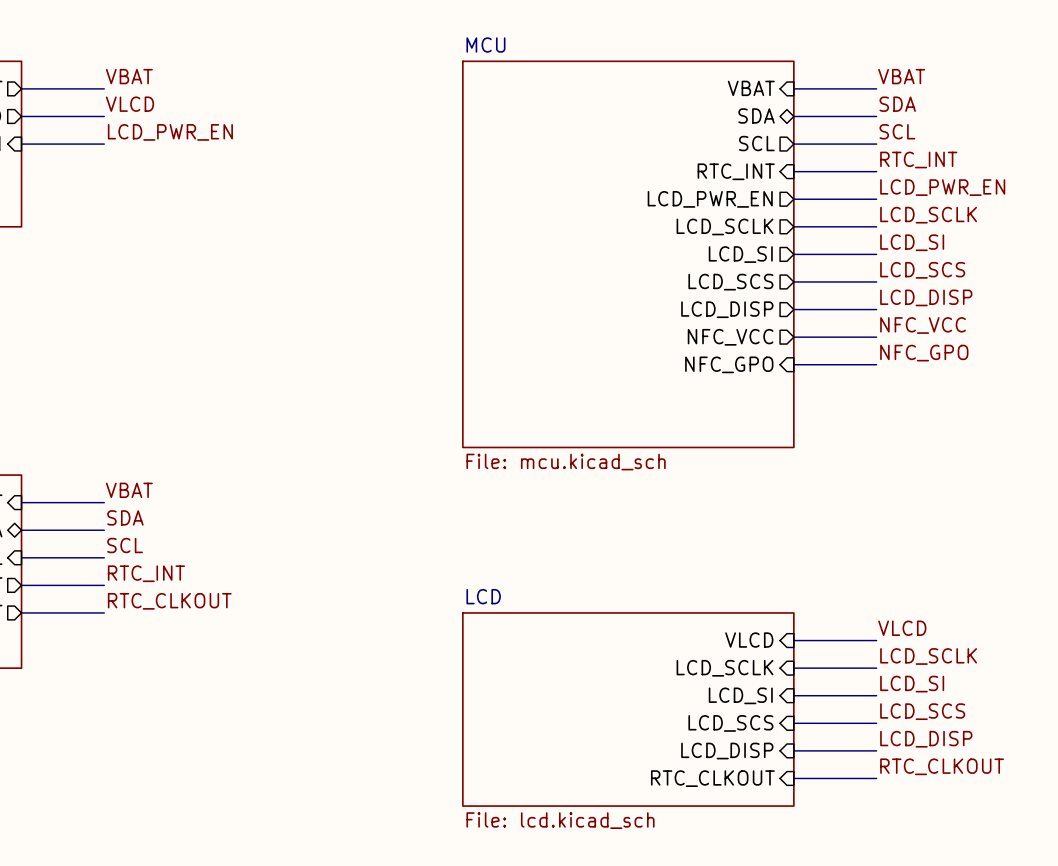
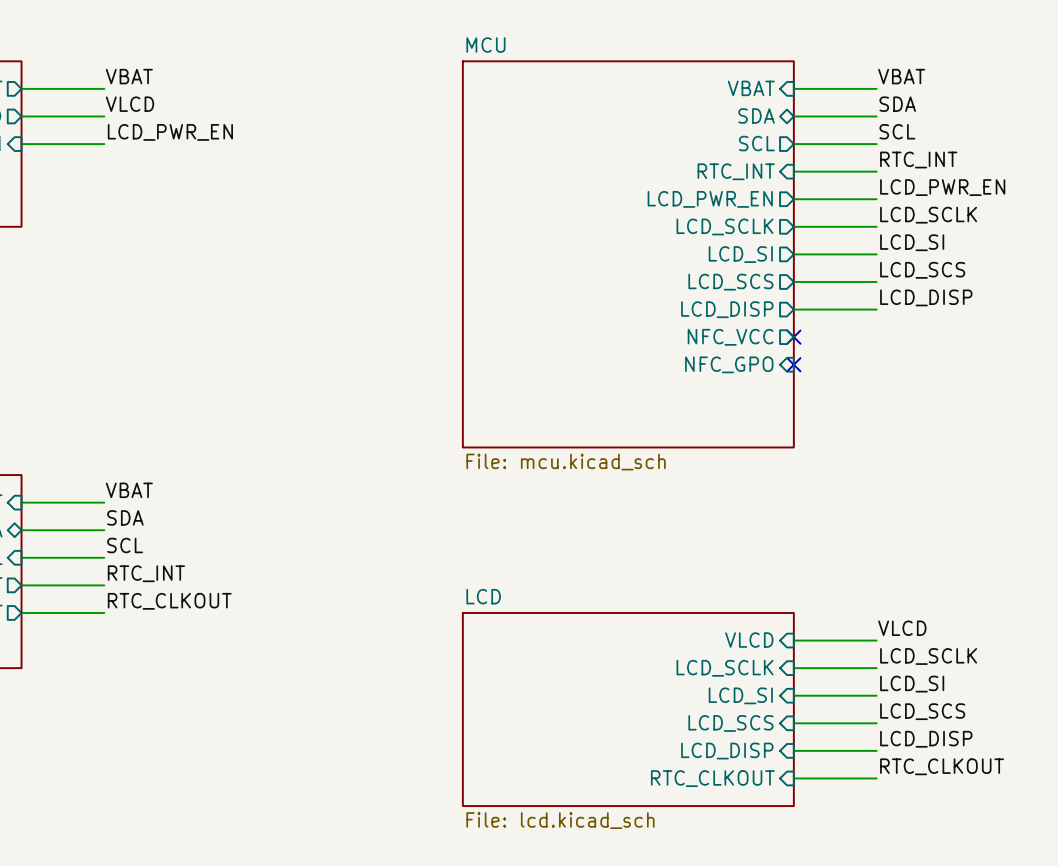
label: NFC_VCC (923, 325) -> none
wire: (793, 337) (876, 337) -> none
no-connect mark: none -> (793, 337)
label: NFC_GPO (924, 353) -> none
wire: (793, 364) (876, 364) -> none
no-connect mark: none -> (793, 364)

